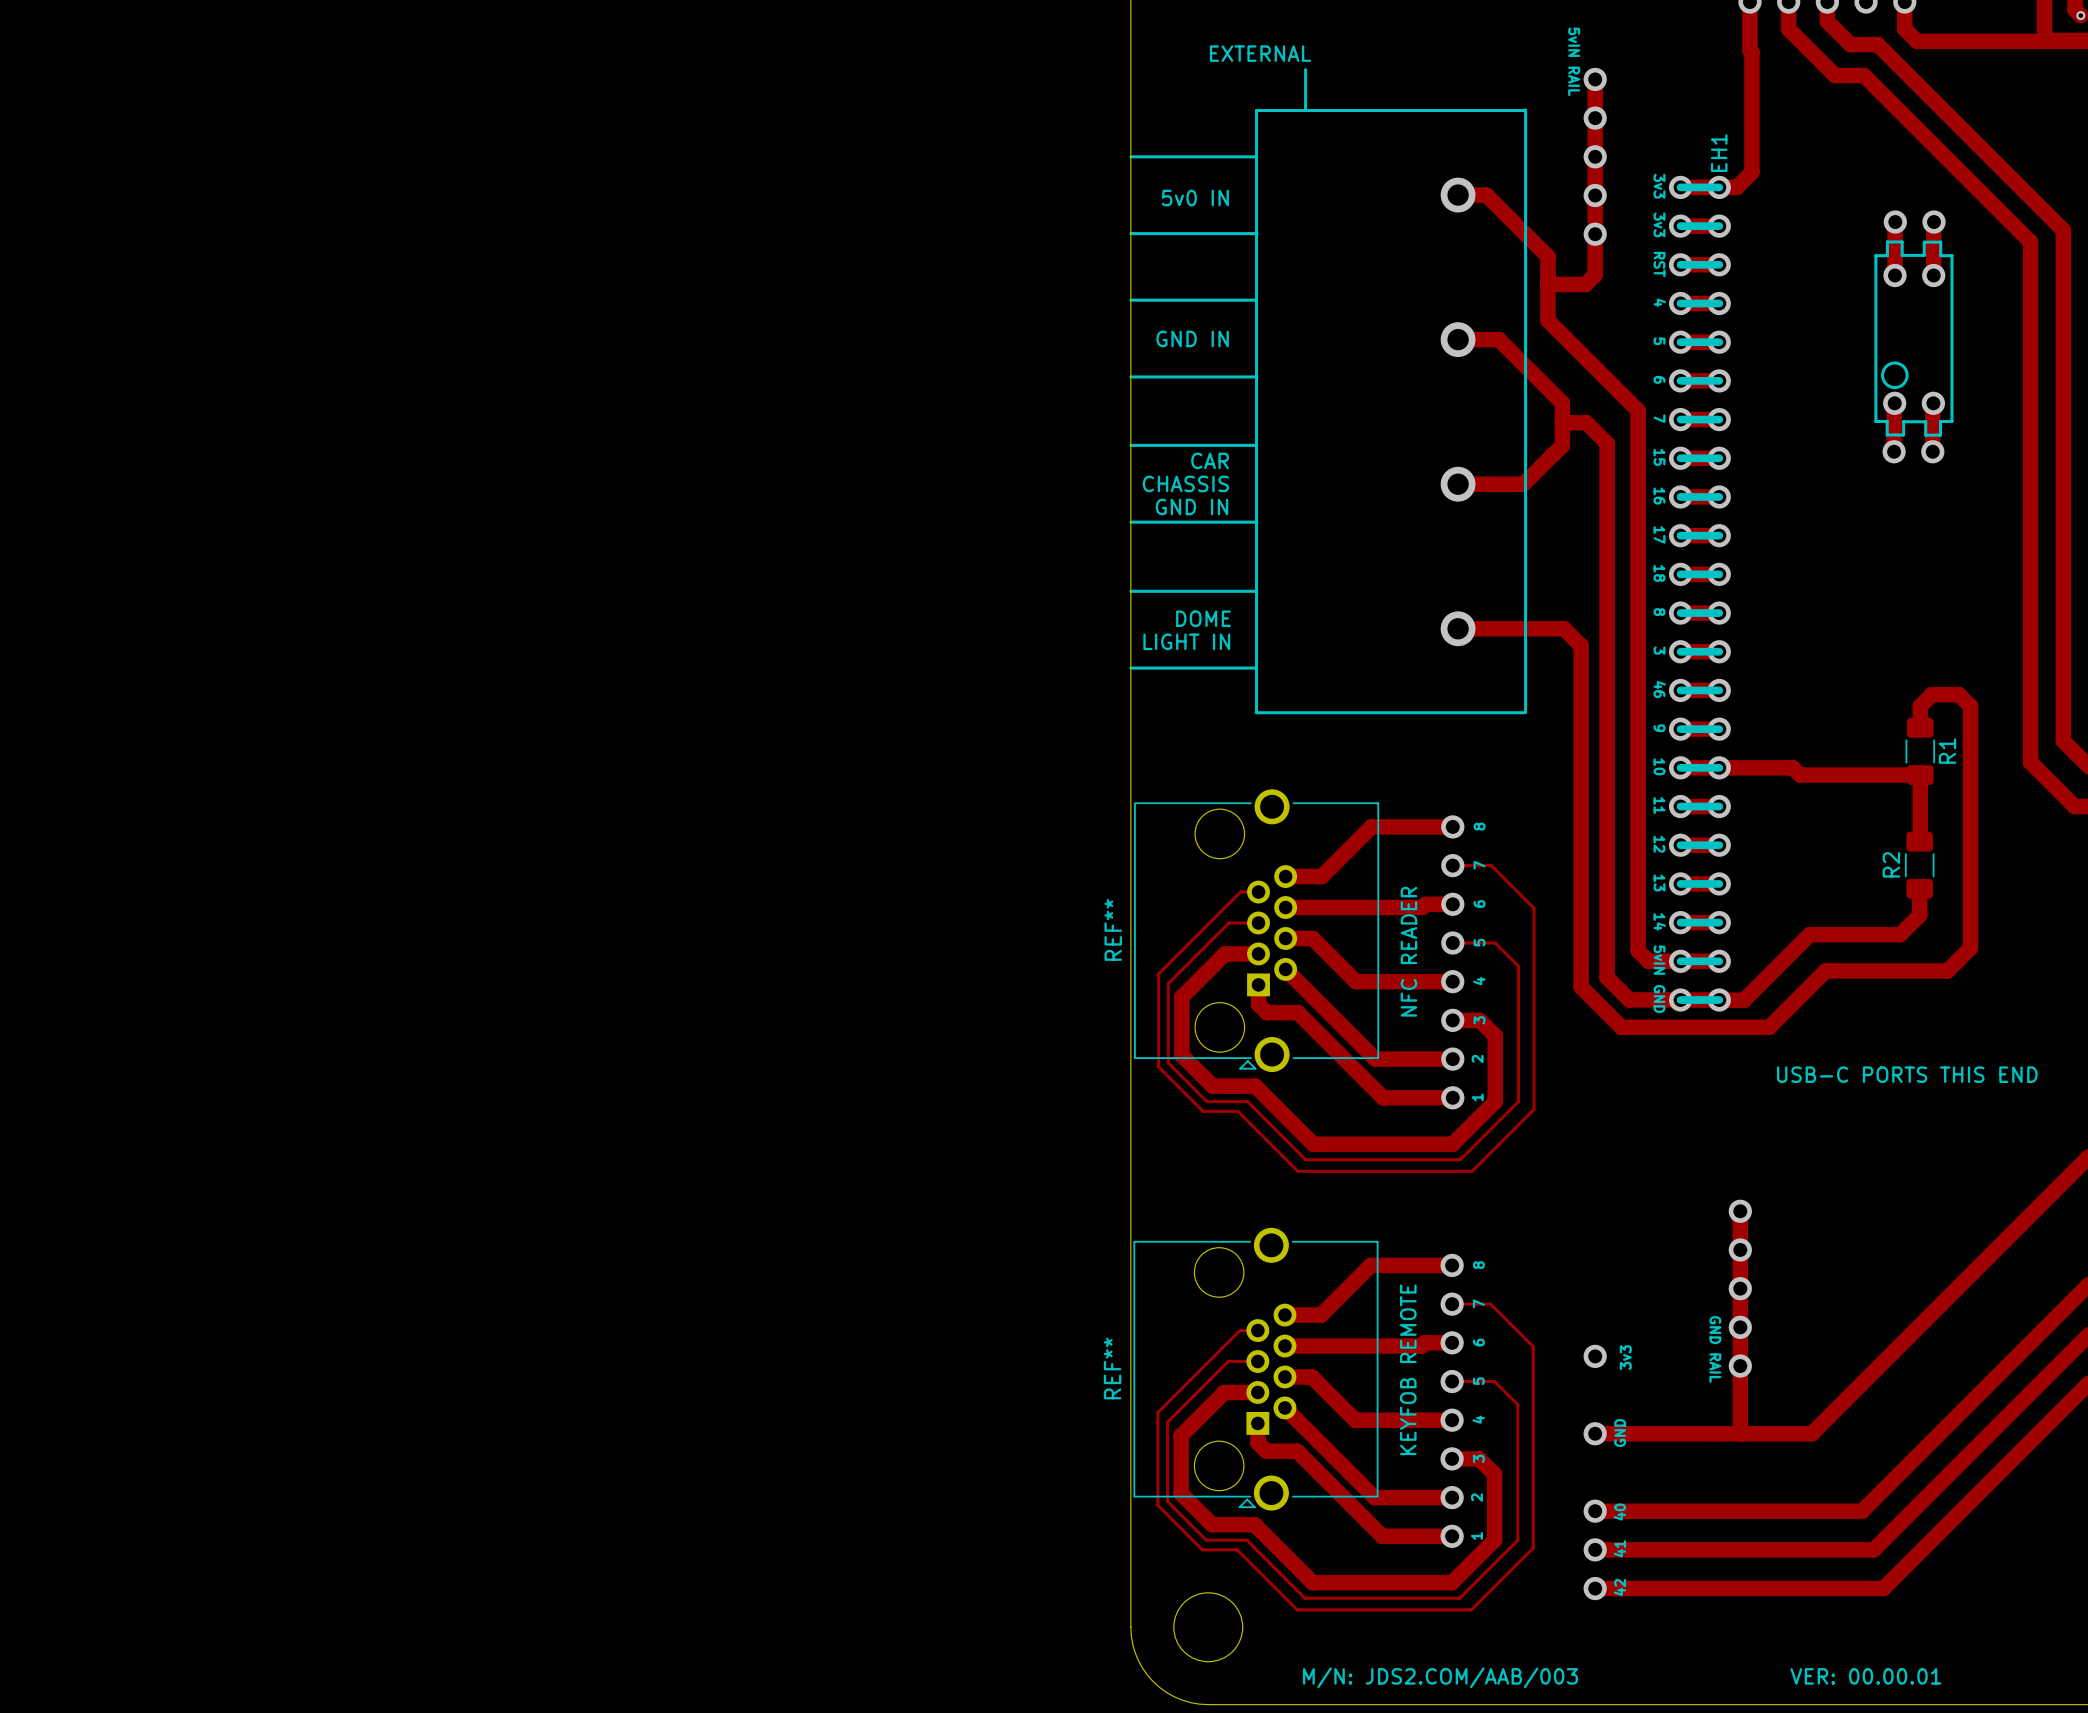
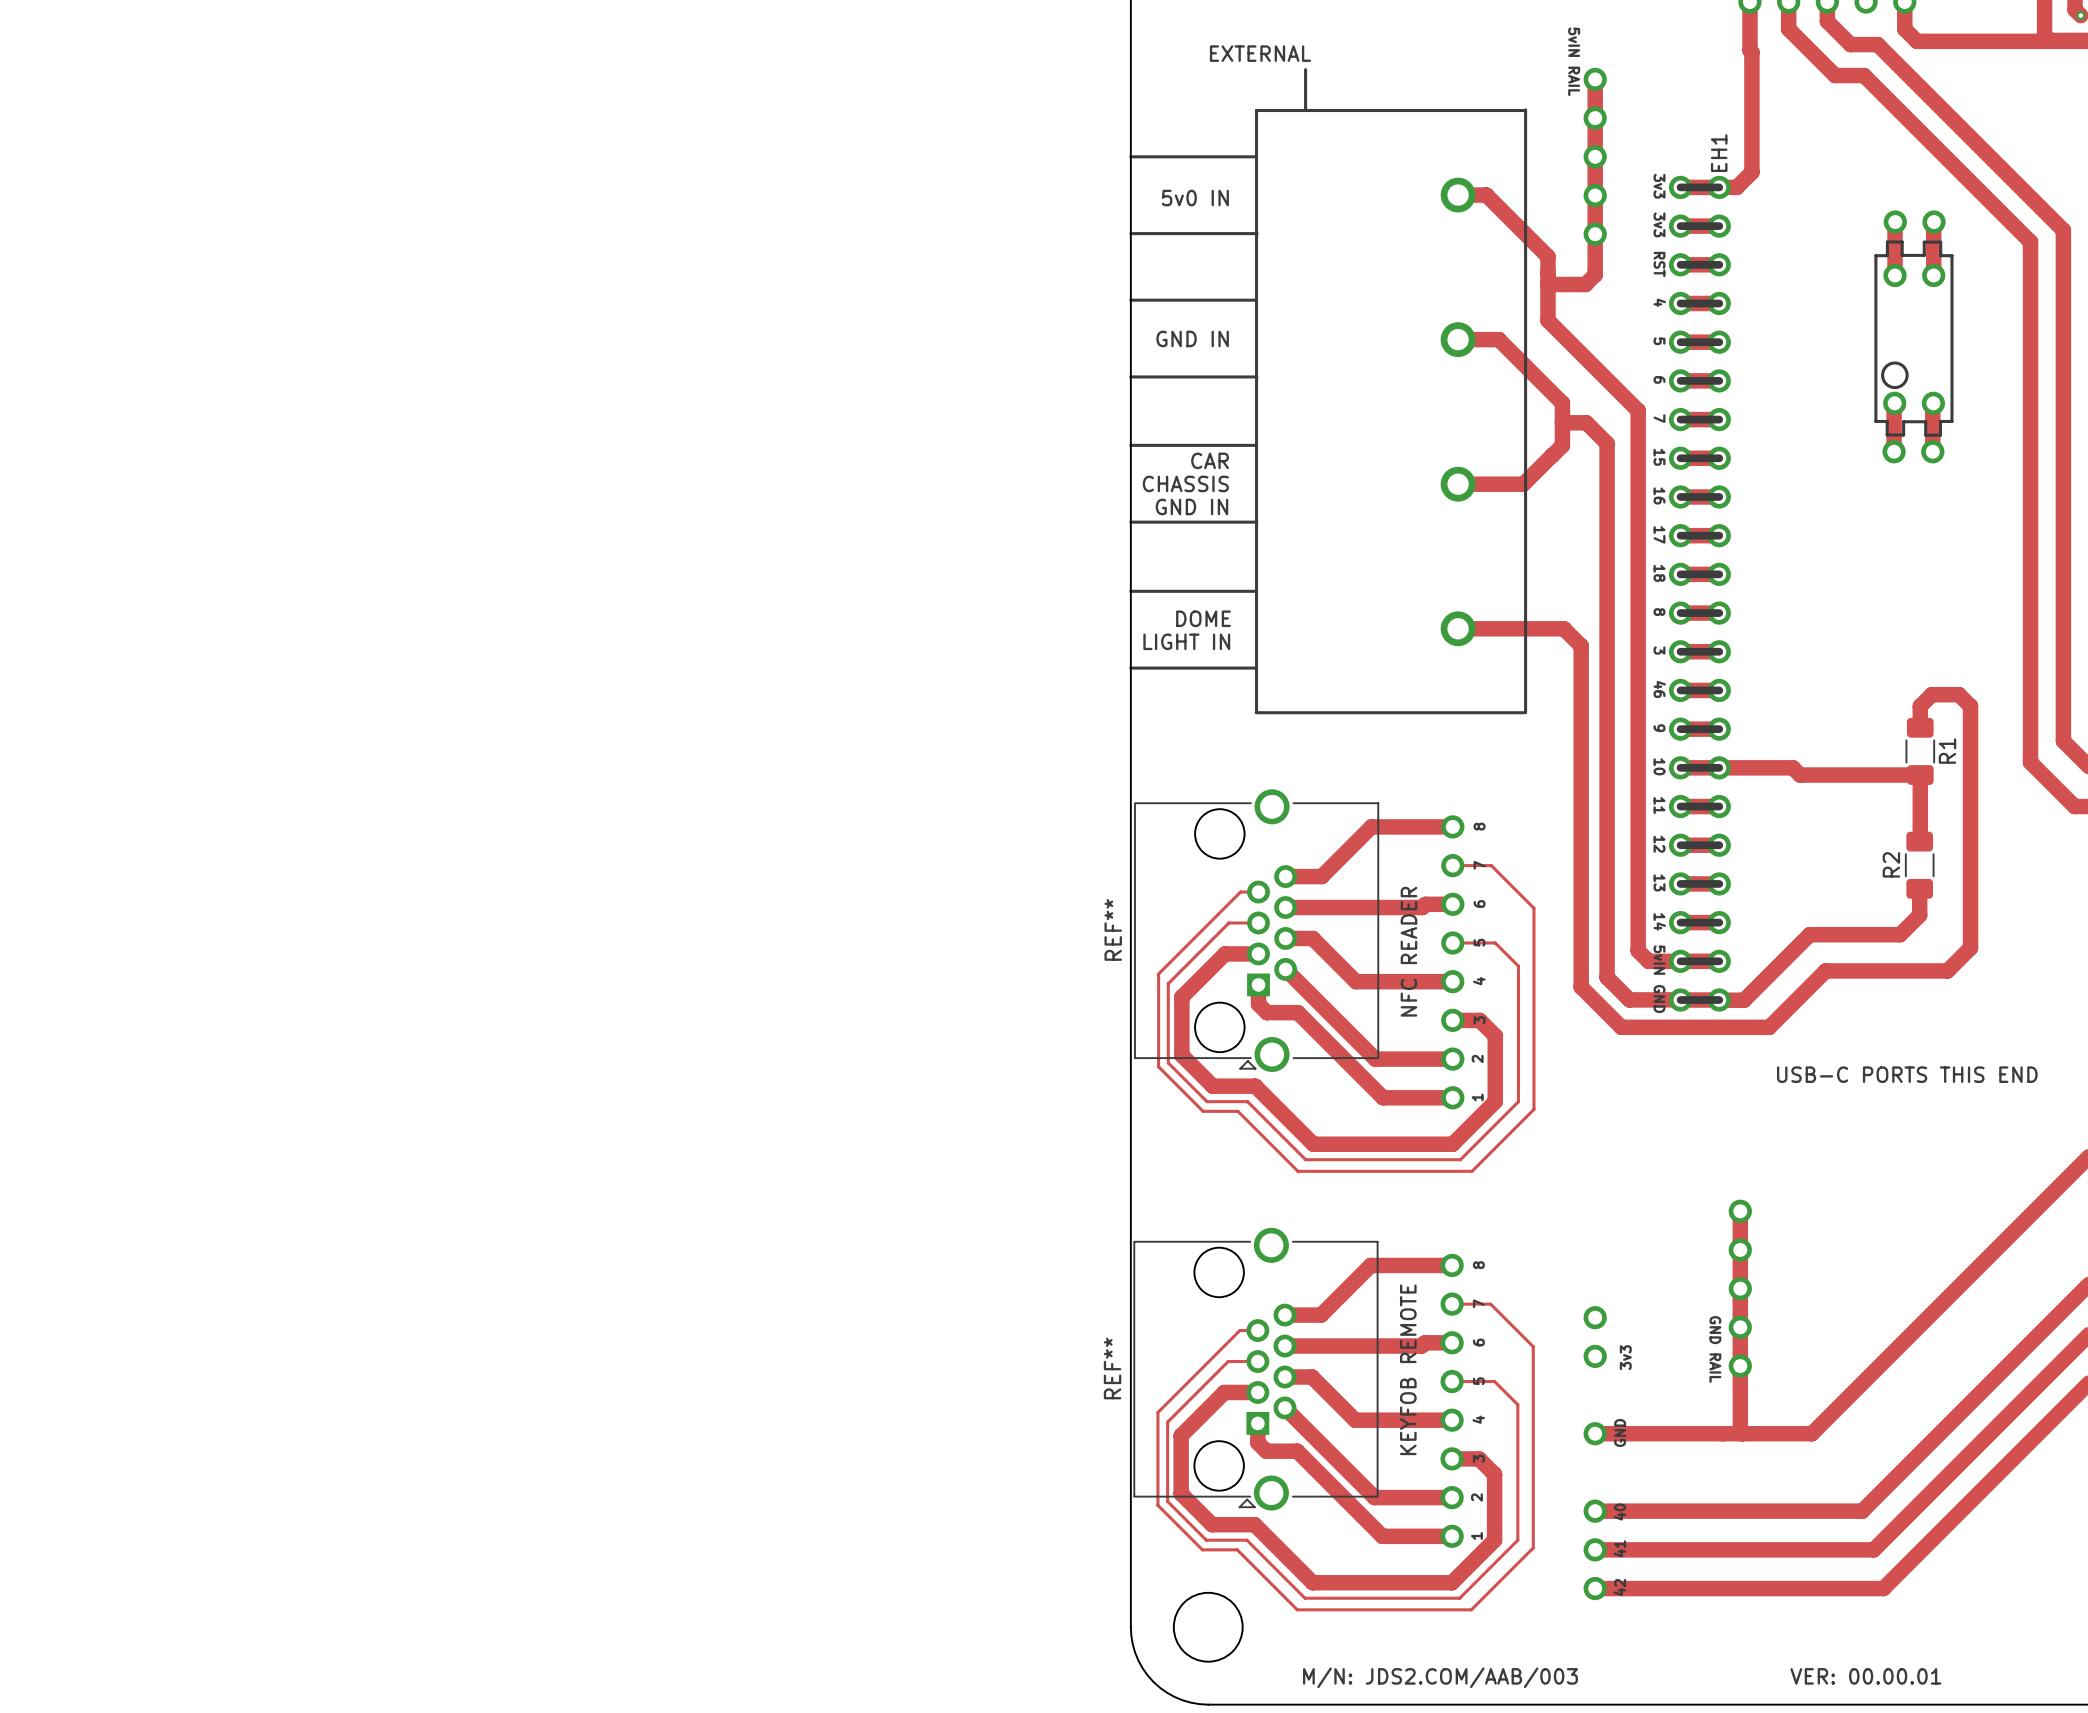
via: none -> (1595, 1317)

